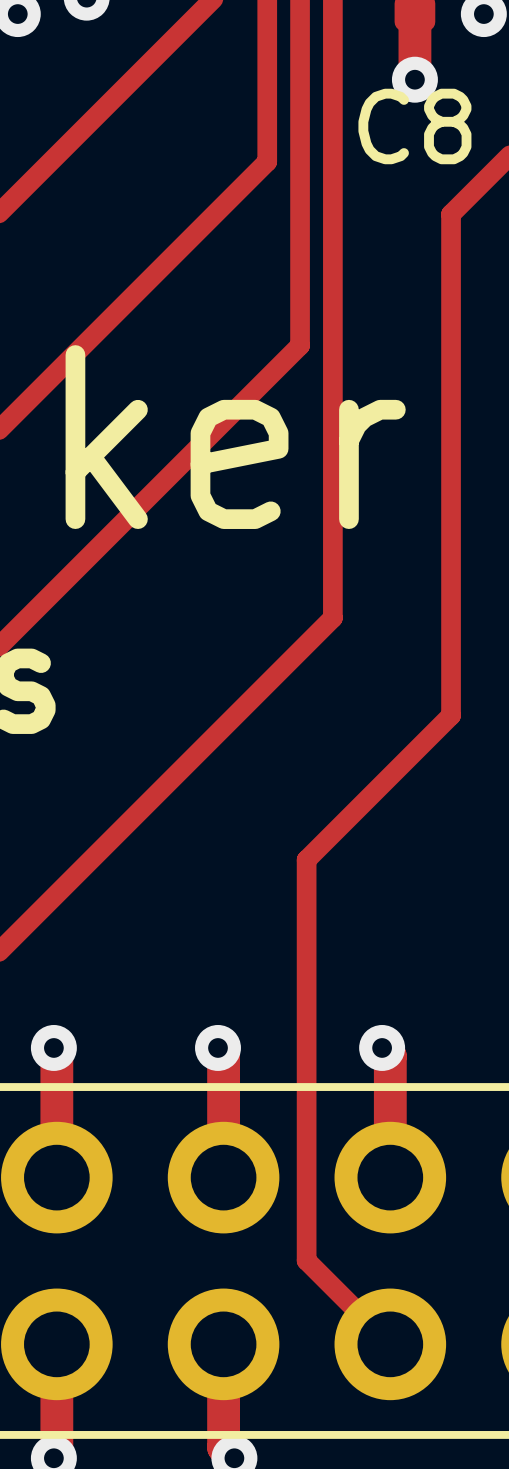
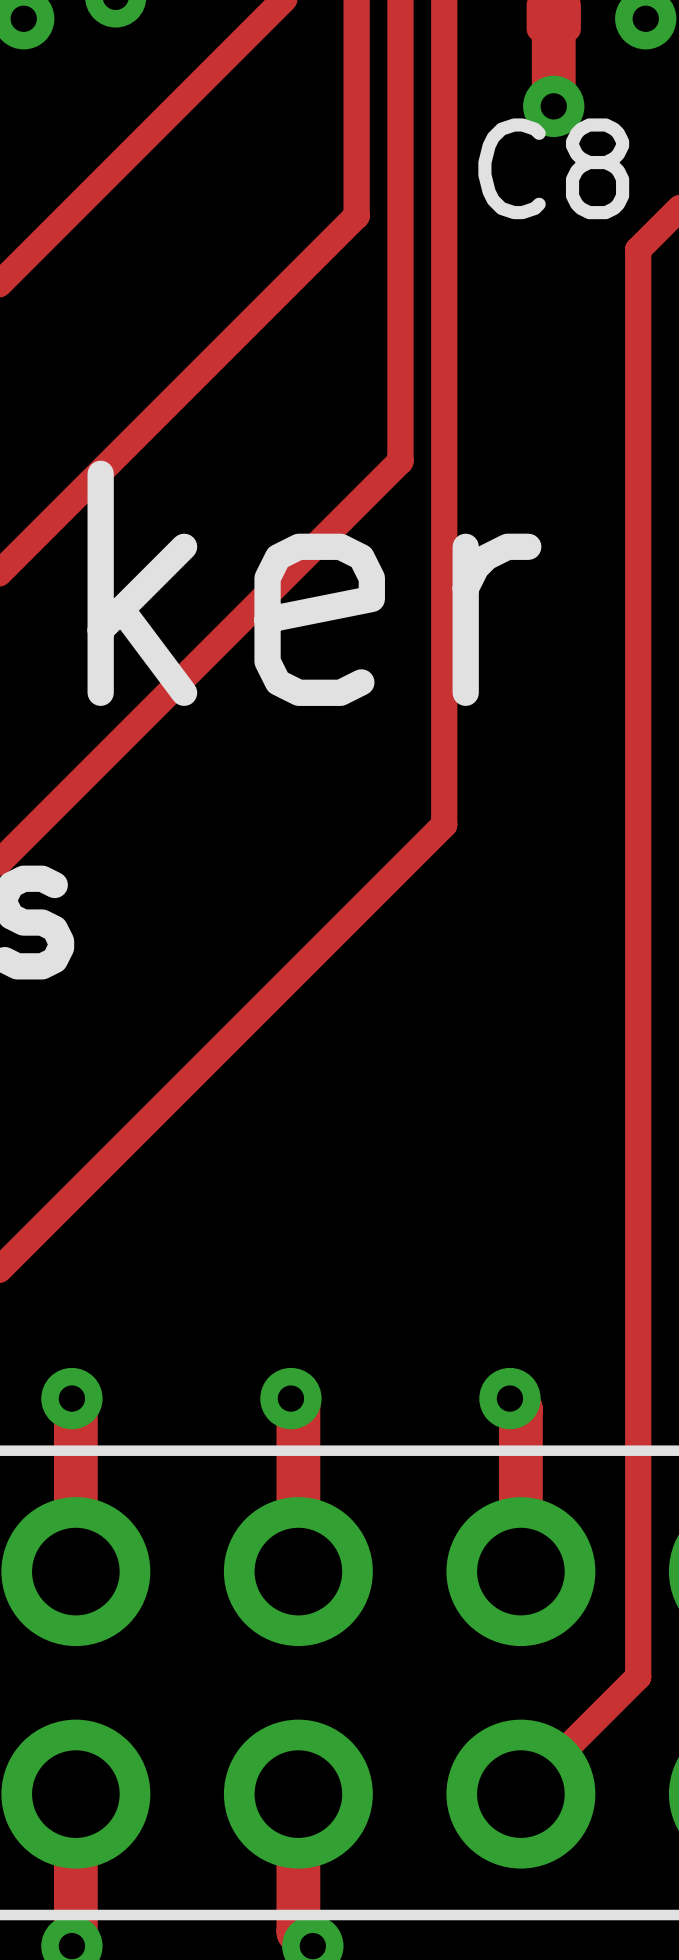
track: (478, 187) (451, 214) (451, 715) (306, 859) (306, 1260) (390, 1344) -> (638, 249) (638, 1676) (520, 1794)

